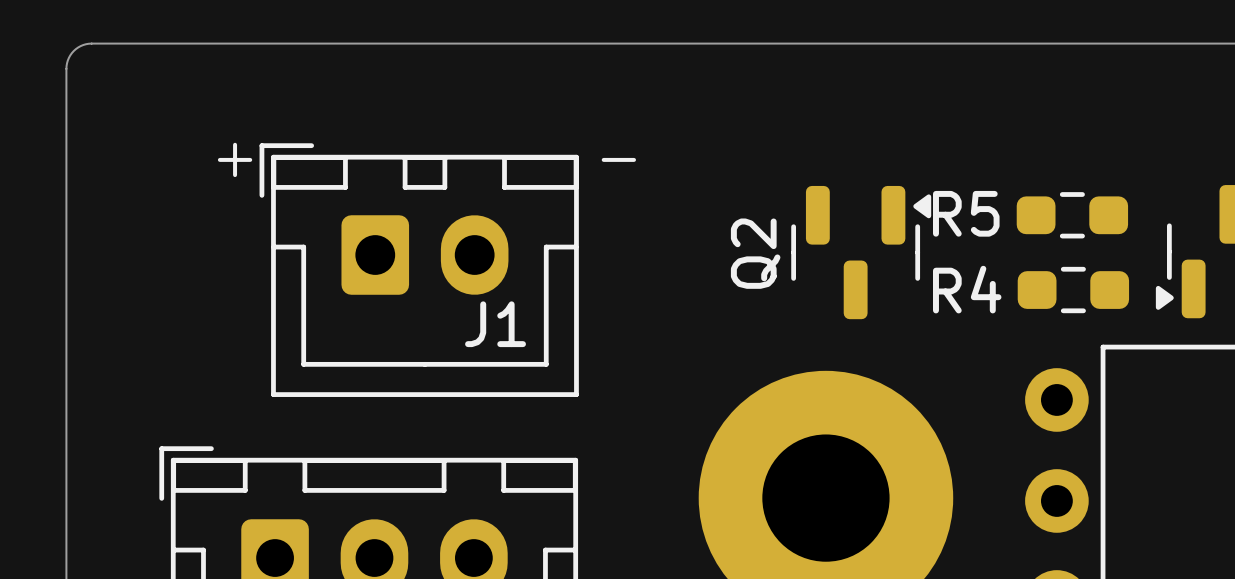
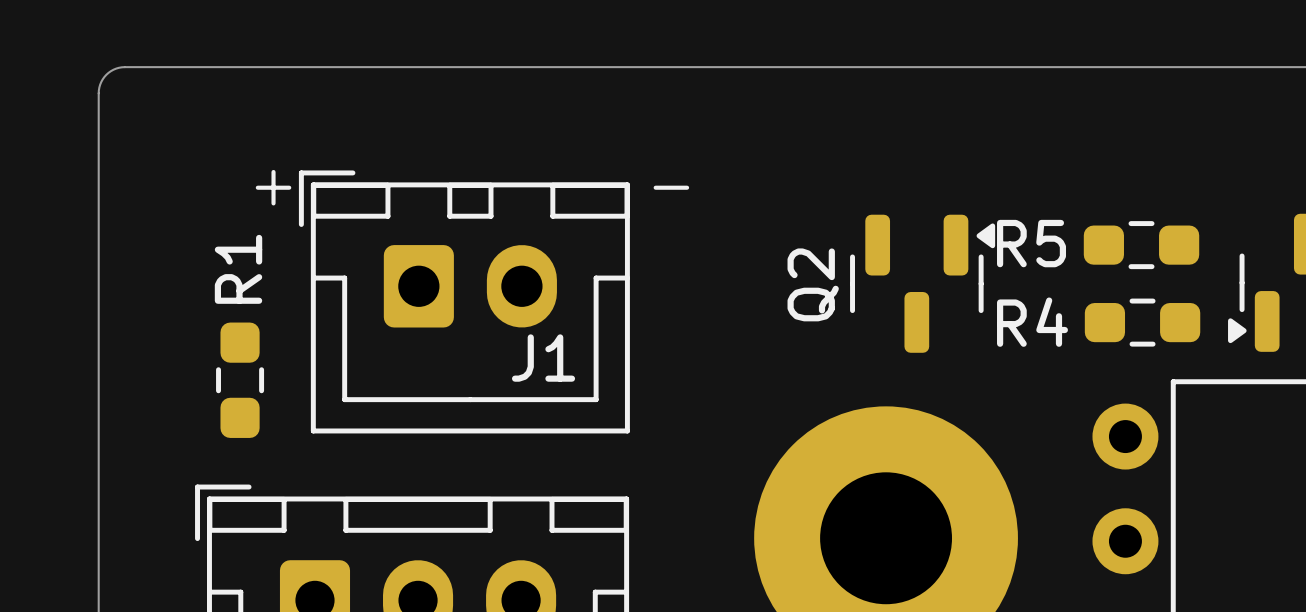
R1: none -> (240, 380)

